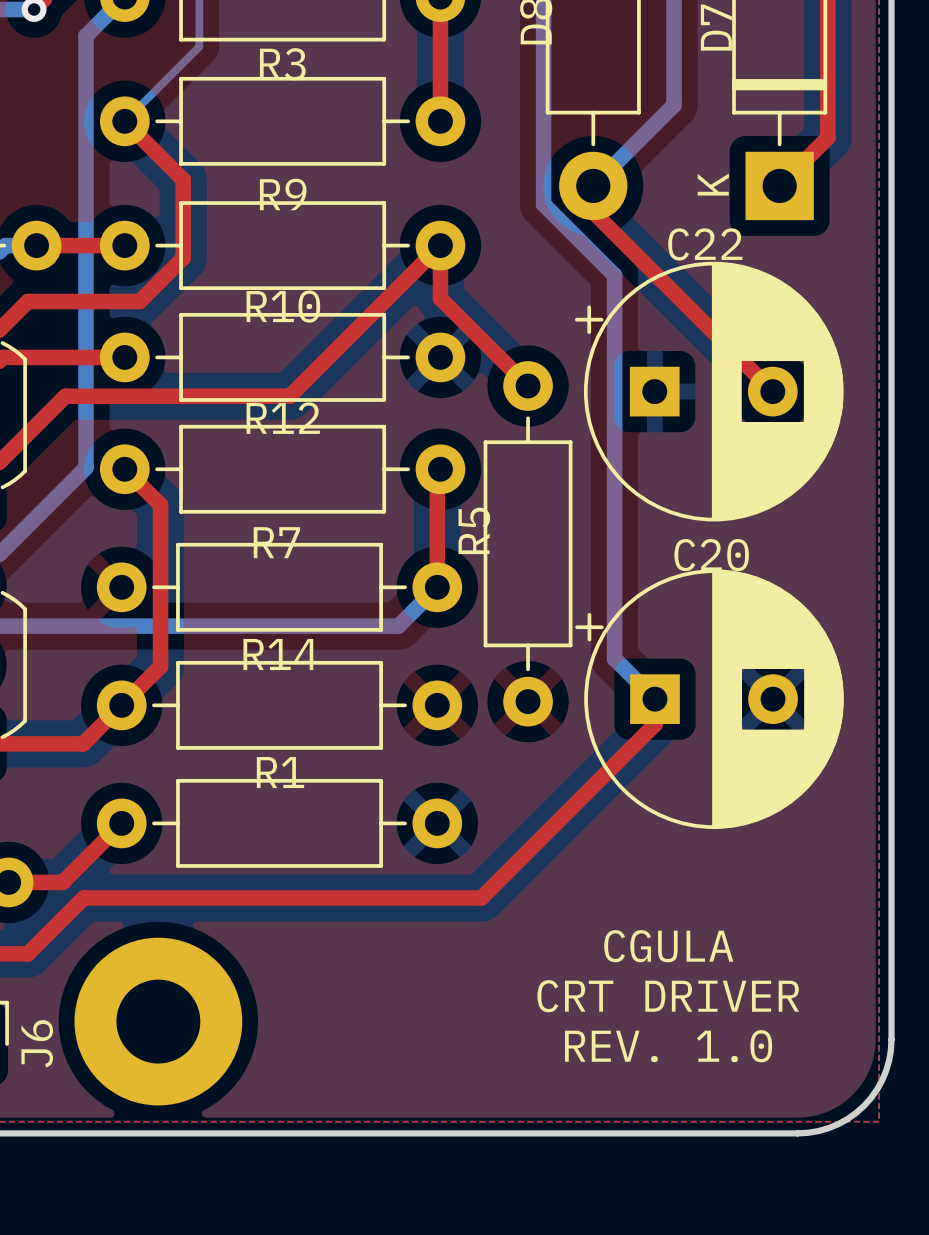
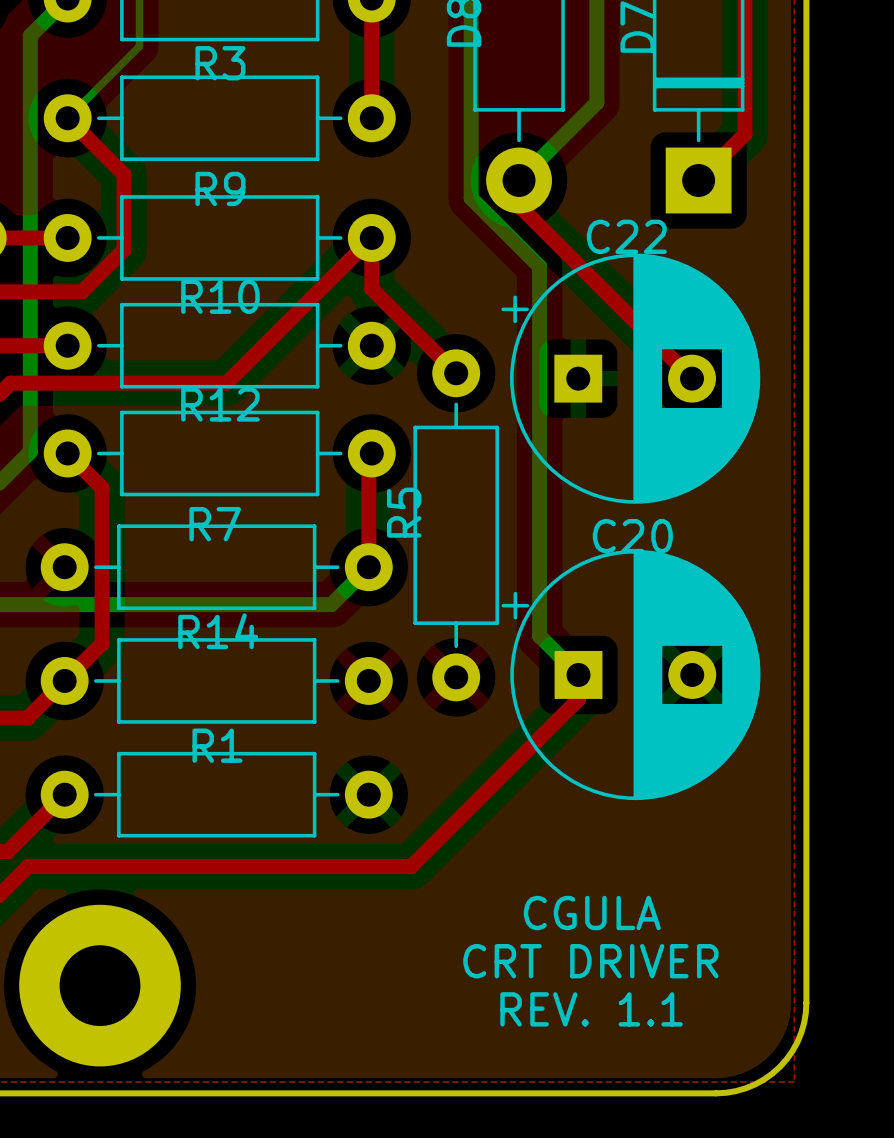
D7 text: K (713, 184) -> none
text: REV. 1.0 (668, 1046) -> REV. 1.1 (591, 1009)

